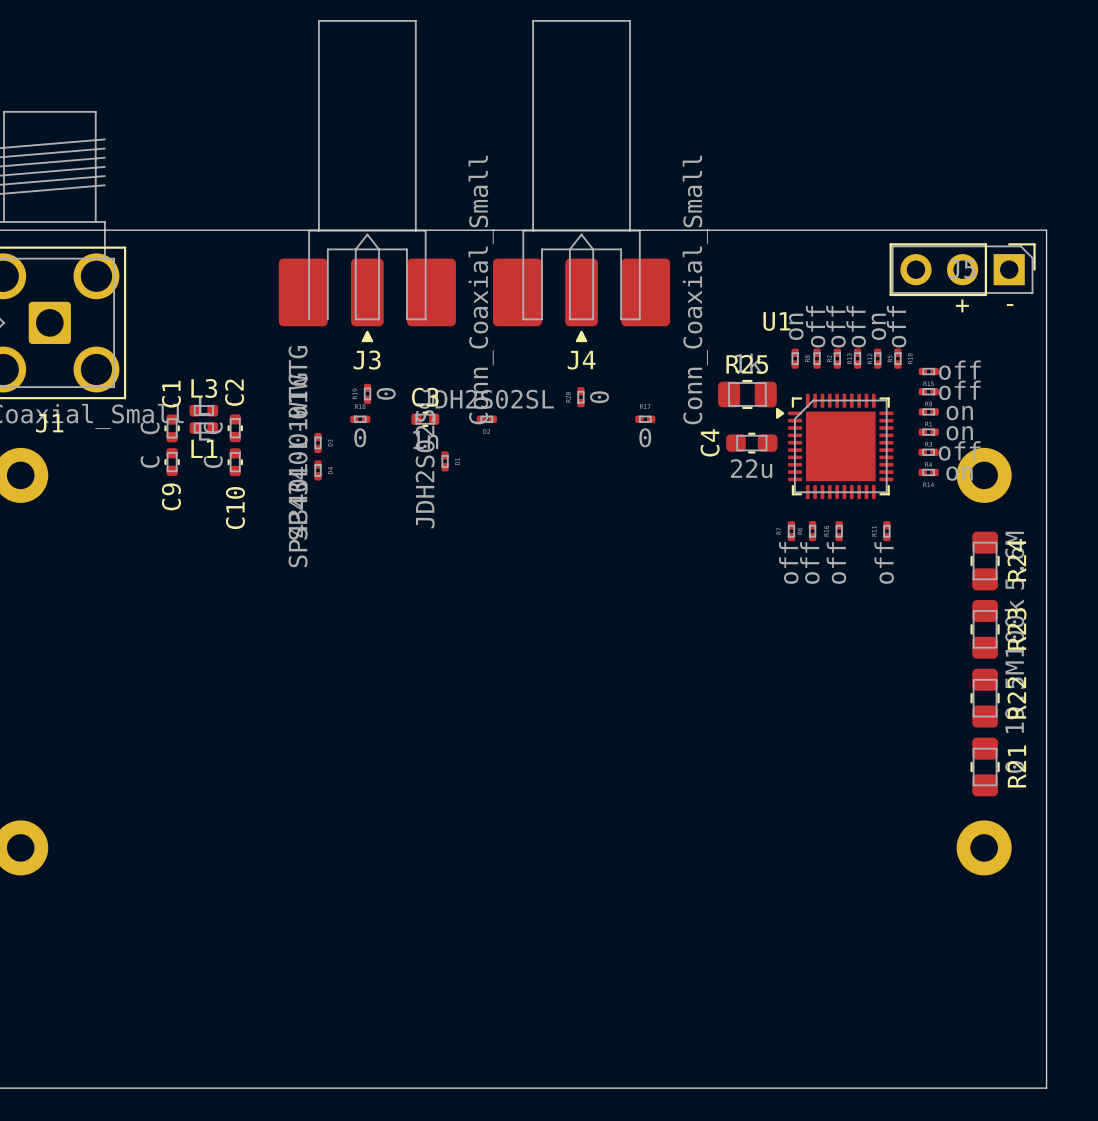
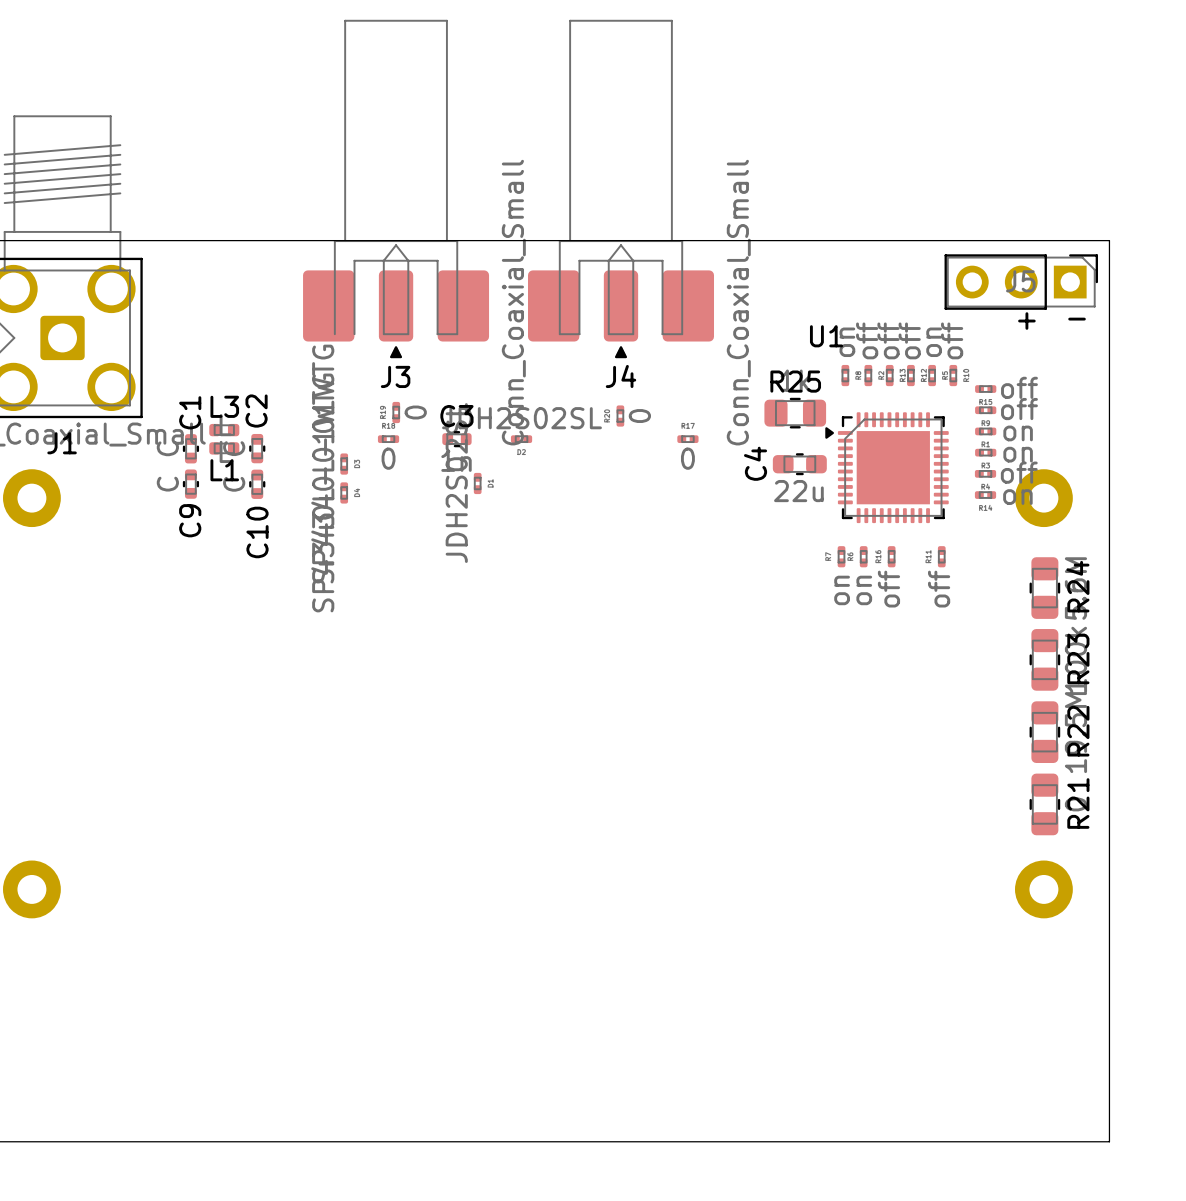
part value: off (788, 563) -> on (842, 590)
part value: off (809, 563) -> on (864, 590)

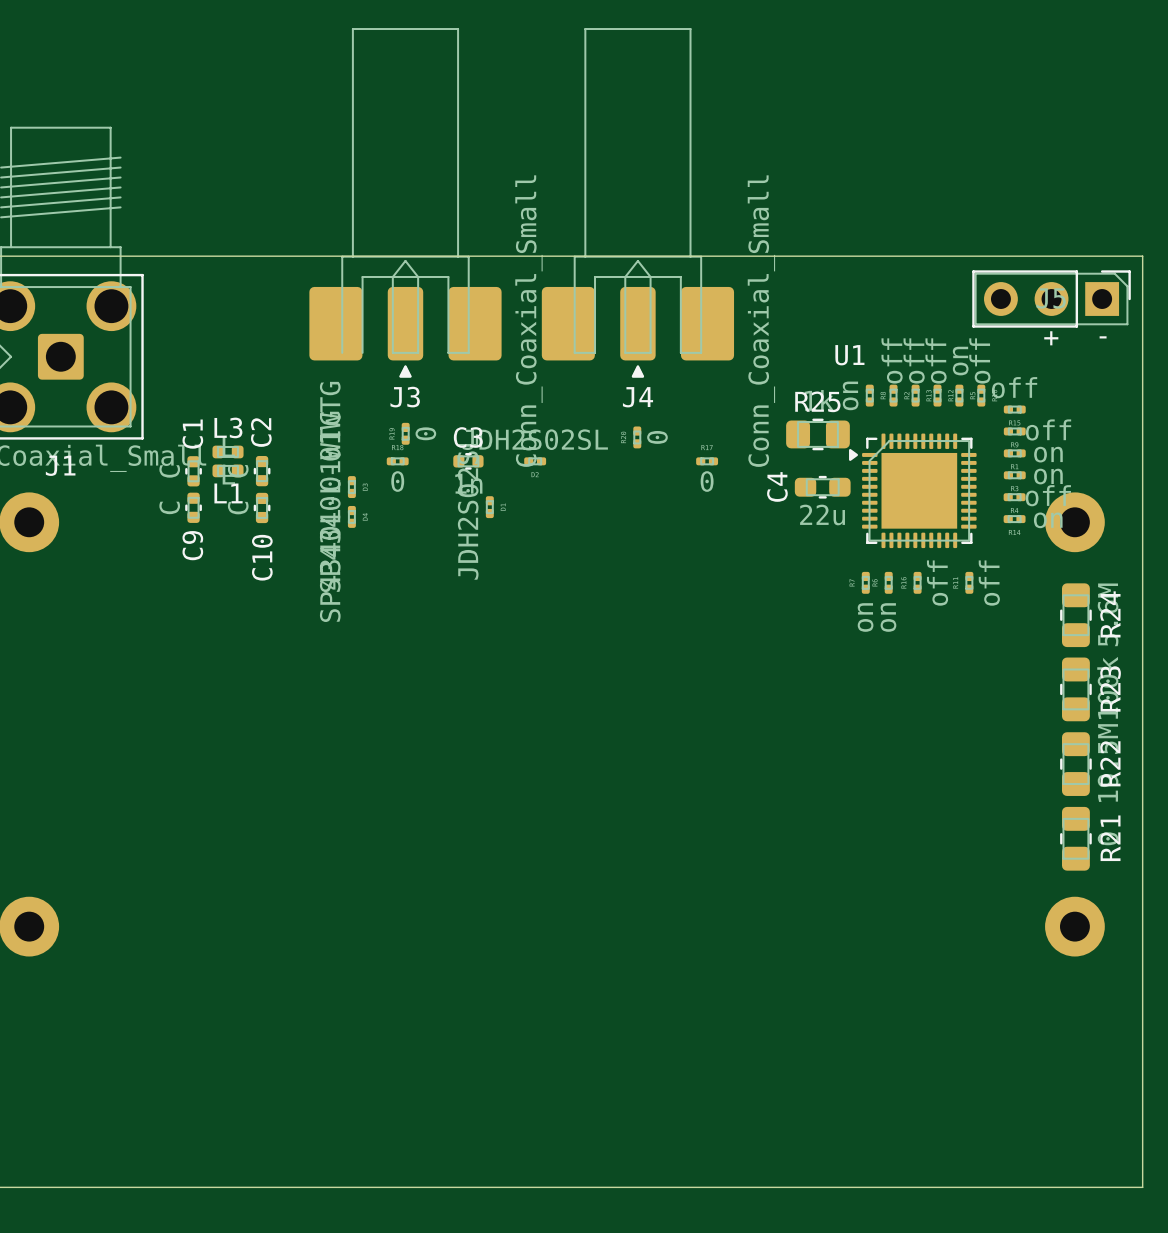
part value position: on (847, 342) -> on (850, 395)
part value position: off (1019, 387) -> off (1014, 387)
part value position: off (888, 589) -> off (937, 583)
part value position: off (939, 589) -> off (989, 583)

